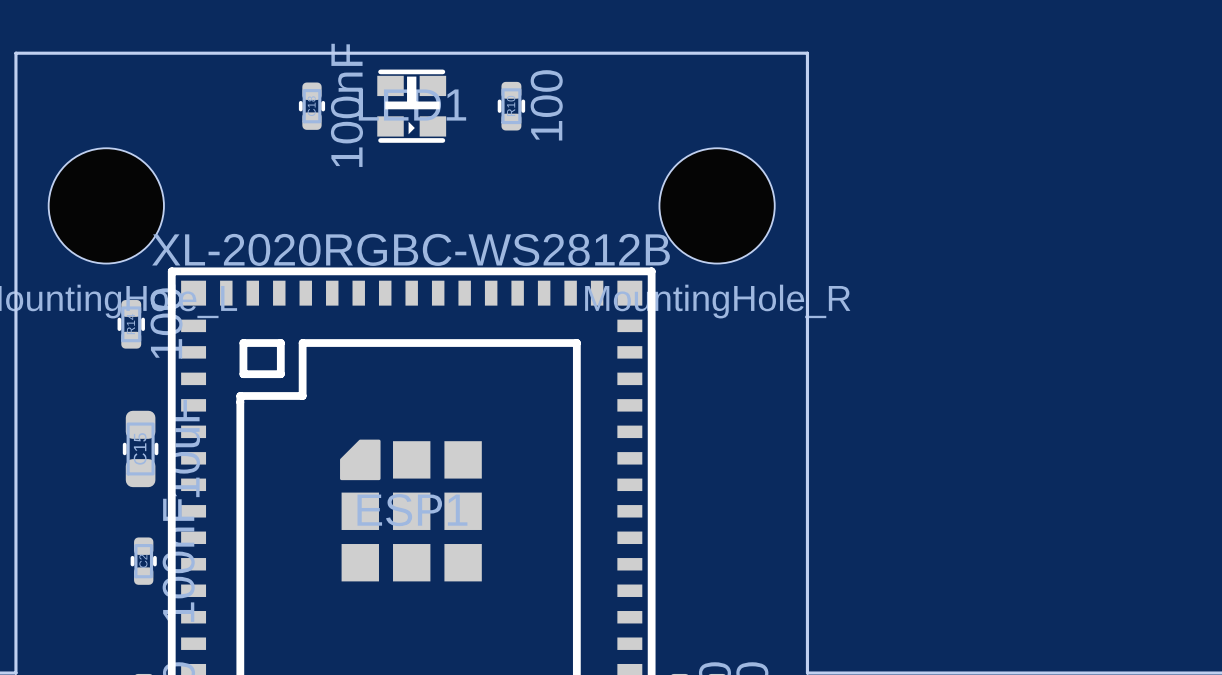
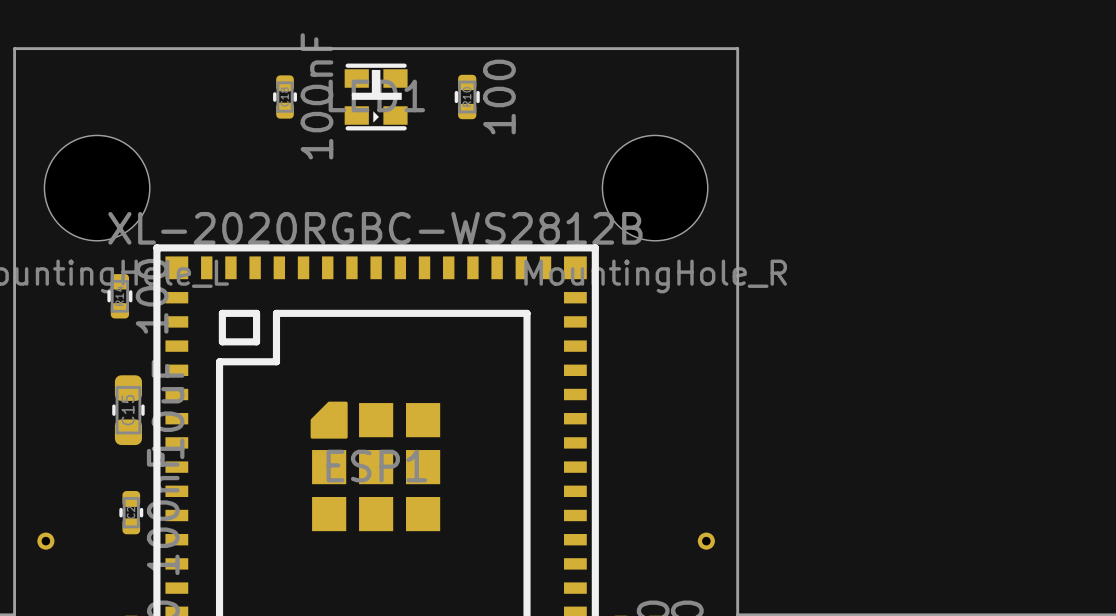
part: none -> (45, 541)
part: none -> (706, 541)

